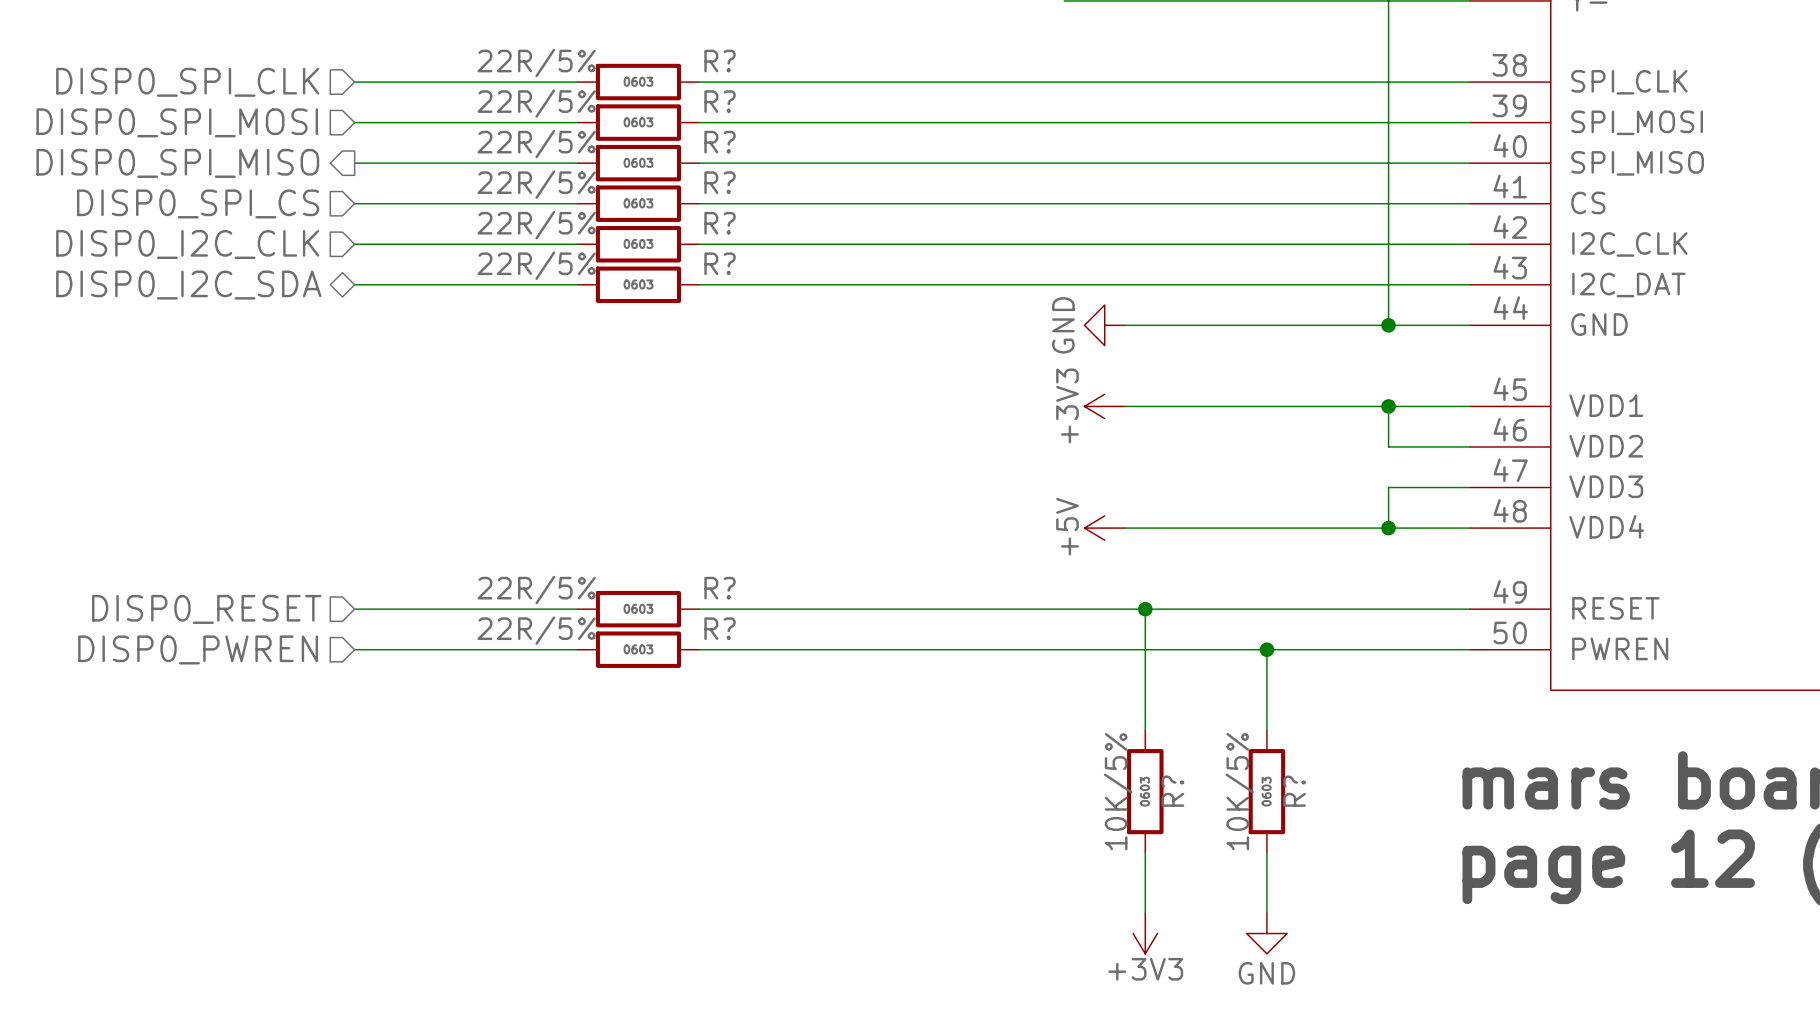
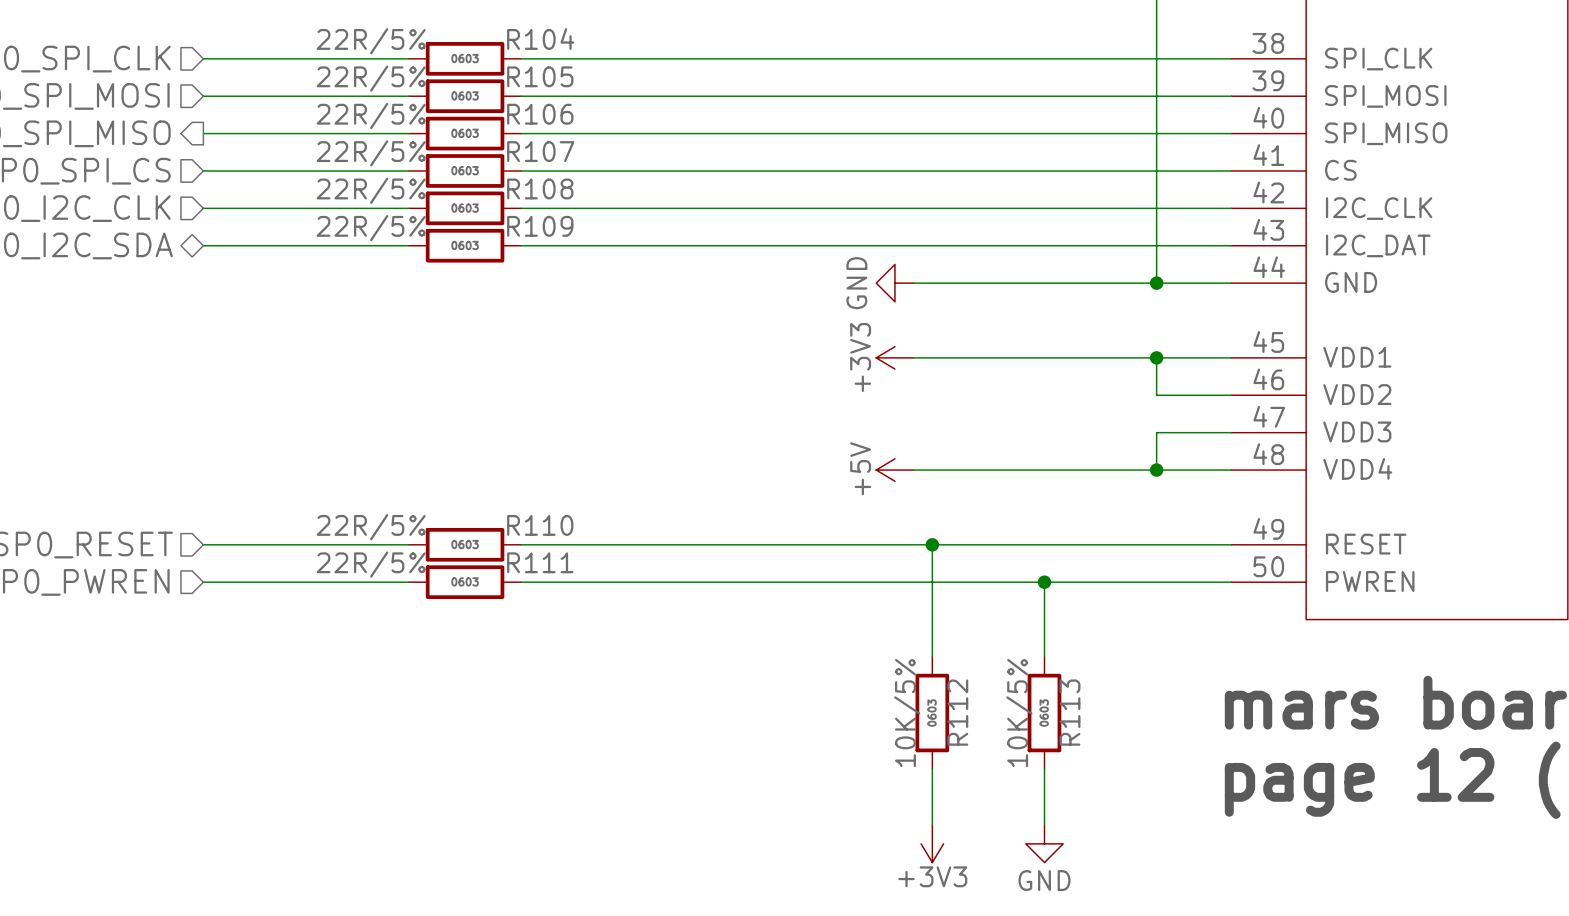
R? name: R? (720, 61) -> R104 (540, 38)
R? name: R? (720, 101) -> R105 (540, 76)
R? name: R? (720, 142) -> R106 (540, 114)
R? name: R? (720, 182) -> R107 (540, 151)
R? name: R? (720, 223) -> R108 (540, 188)
R? name: R? (720, 263) -> R109 (540, 226)
R? name: R? (720, 588) -> R110 (540, 525)
R? name: R? (720, 628) -> R111 (540, 562)
R? name: R? (1172, 791) -> R112 (957, 712)
R? name: R? (1294, 791) -> R113 (1069, 712)

